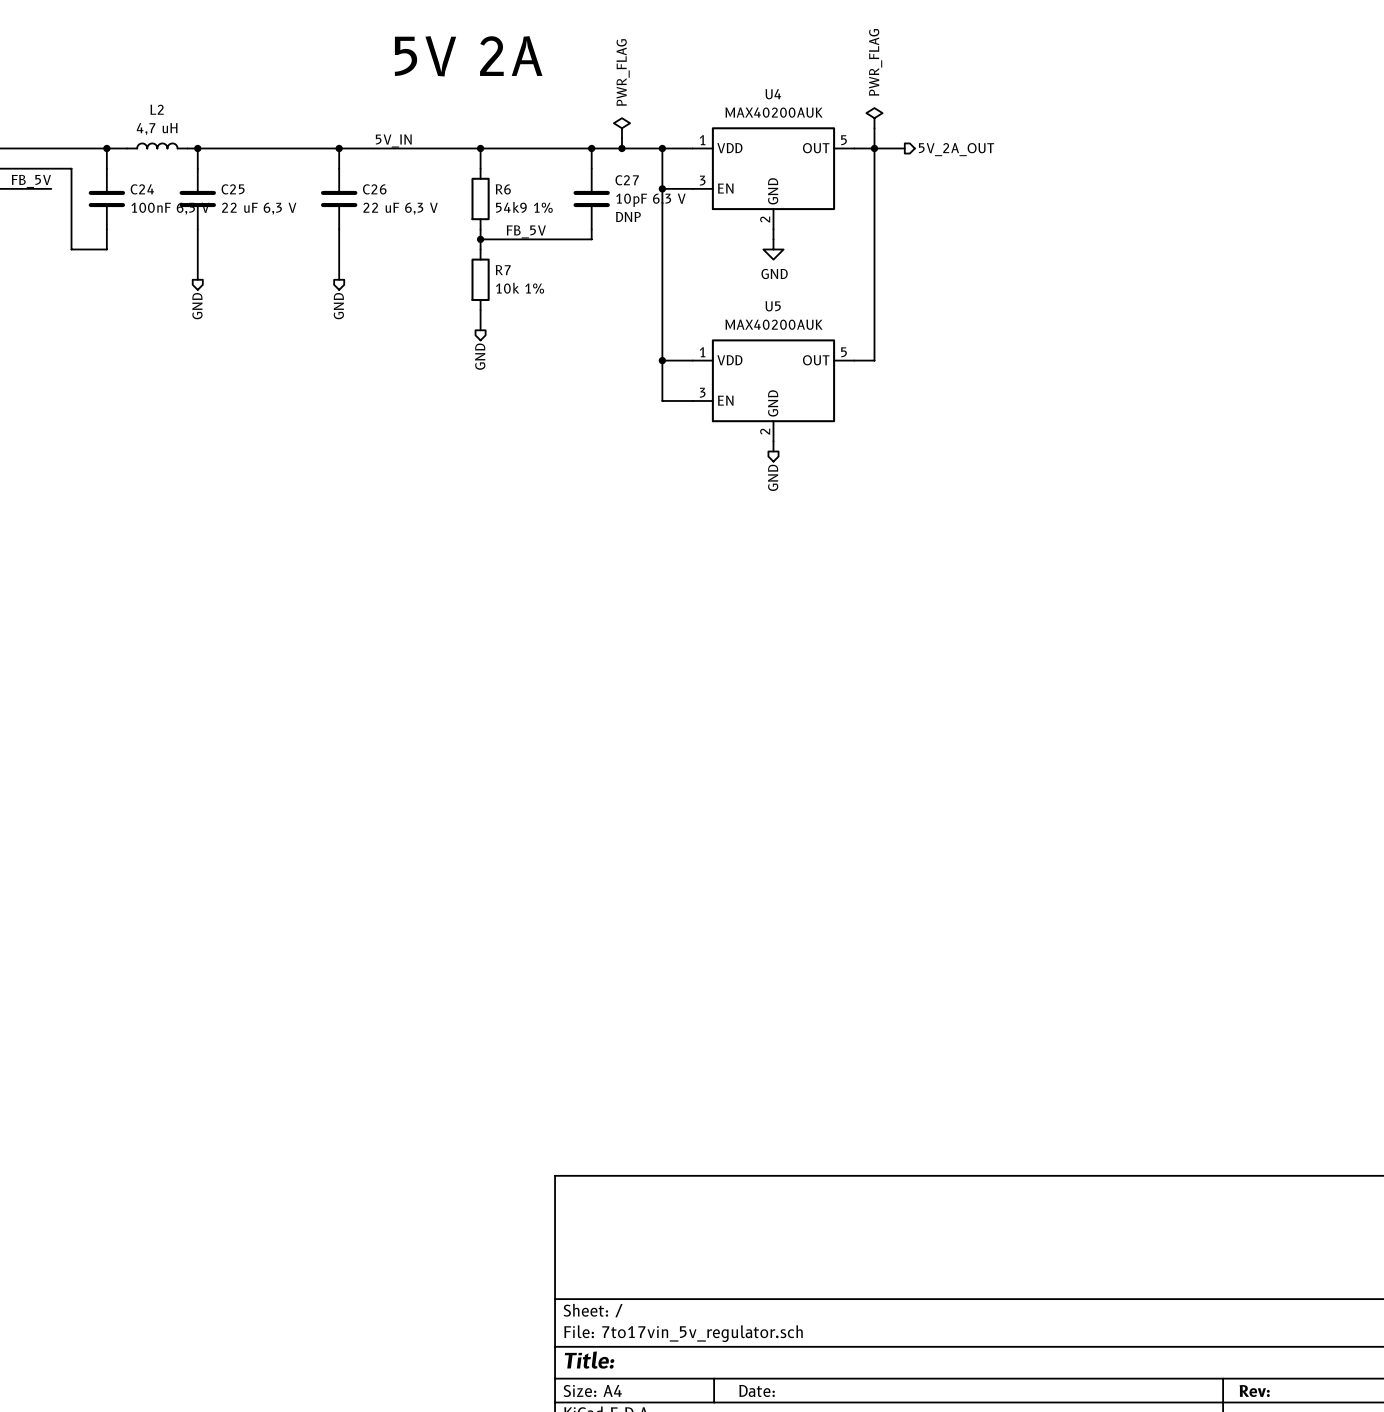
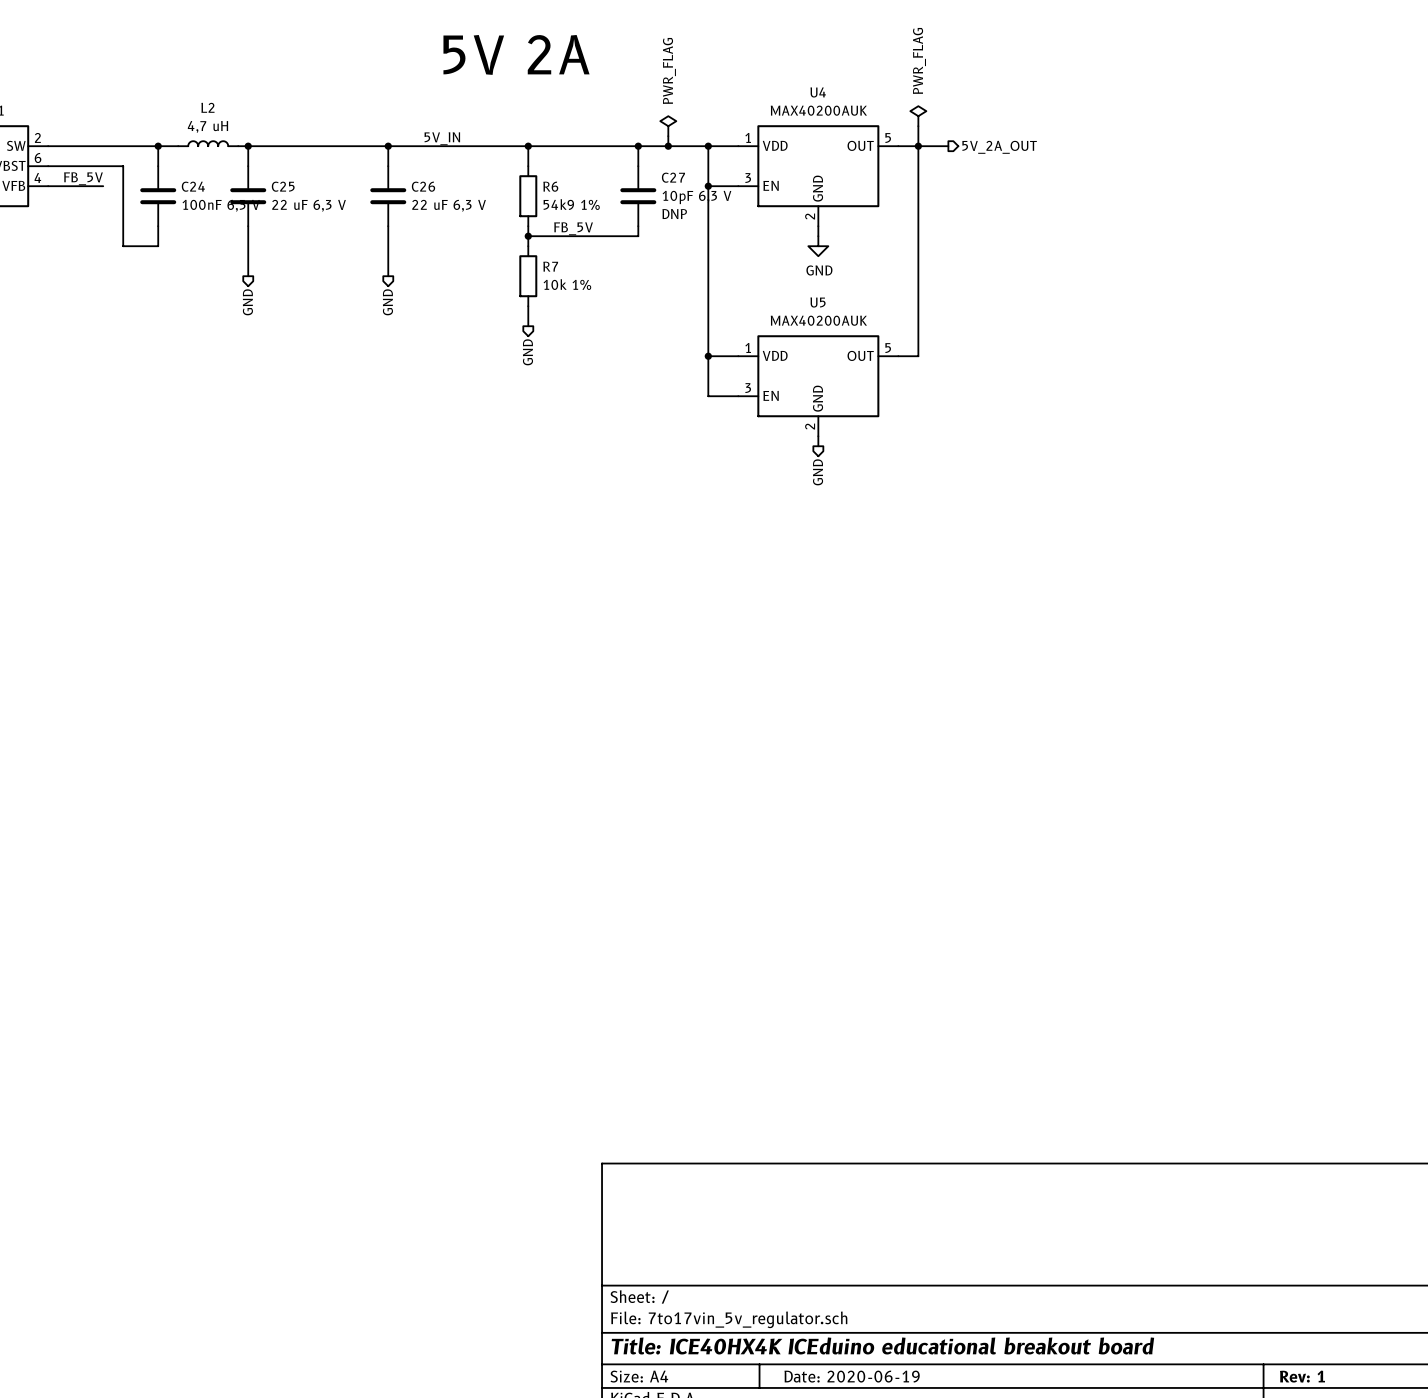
title block: Title: (589, 1360) -> Title: ICE40HX4K ICEduino educational breakout board (882, 1345)
title block: Date: (757, 1391) -> Date: 2020-06-19 (852, 1376)
title block: Rev: (1254, 1391) -> Rev: 1 (1302, 1376)

